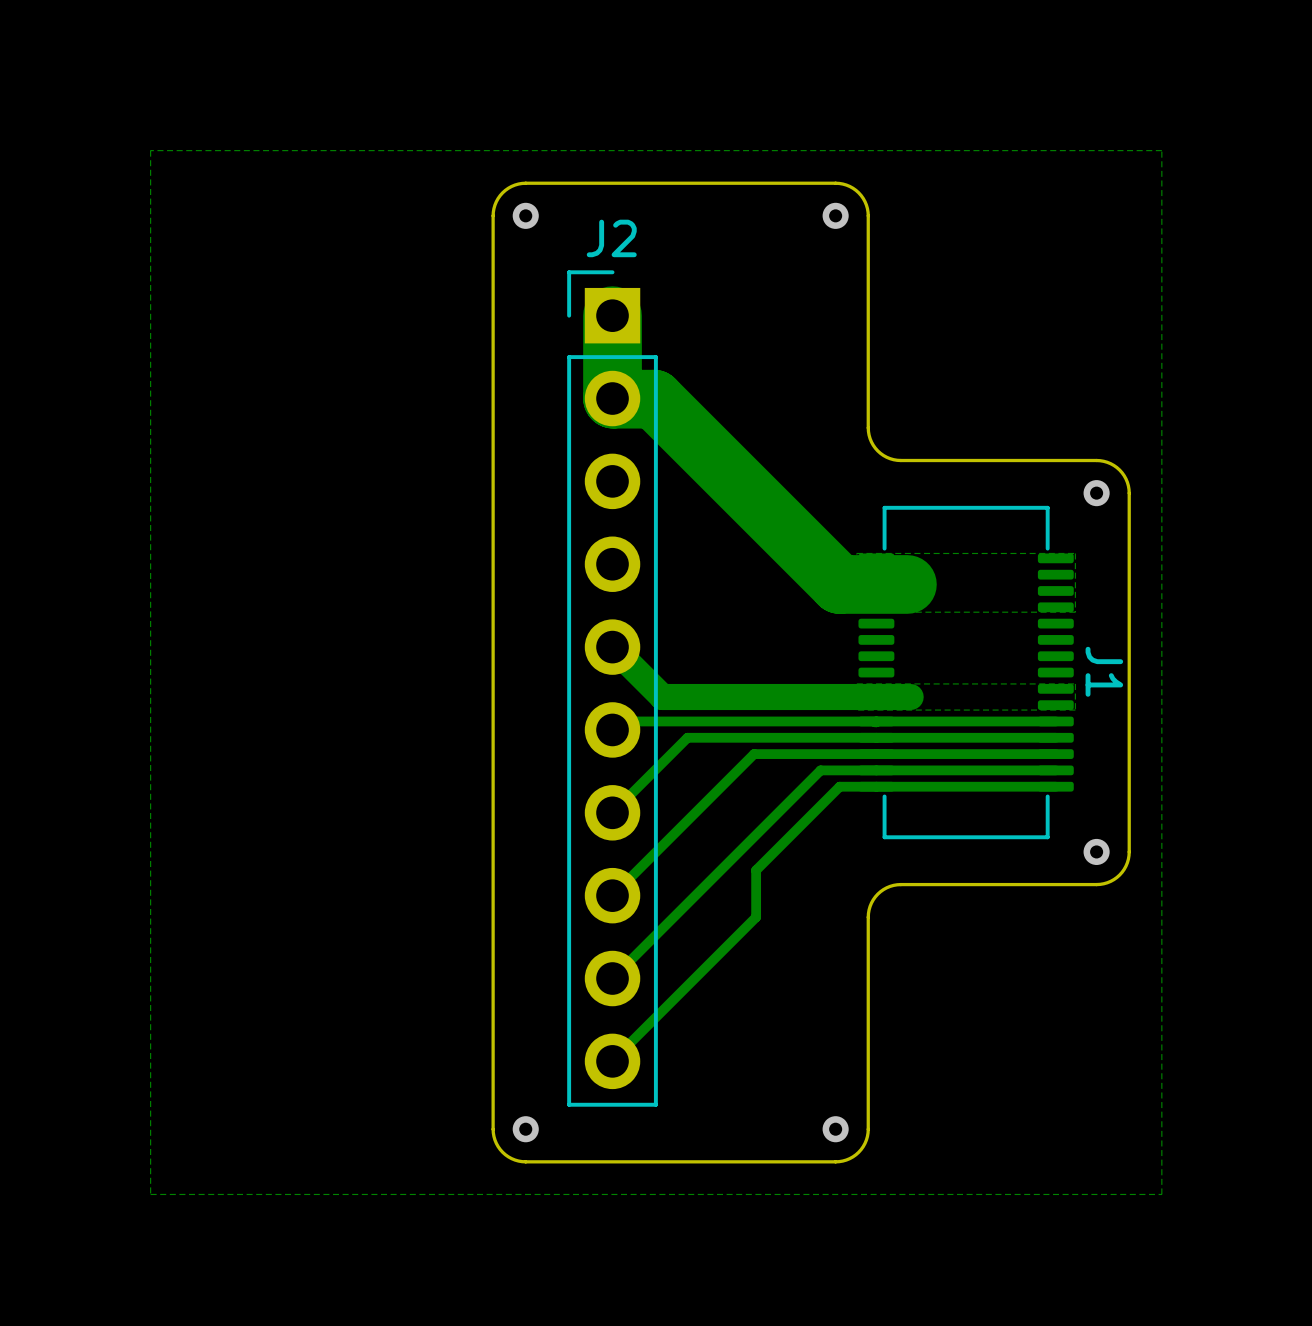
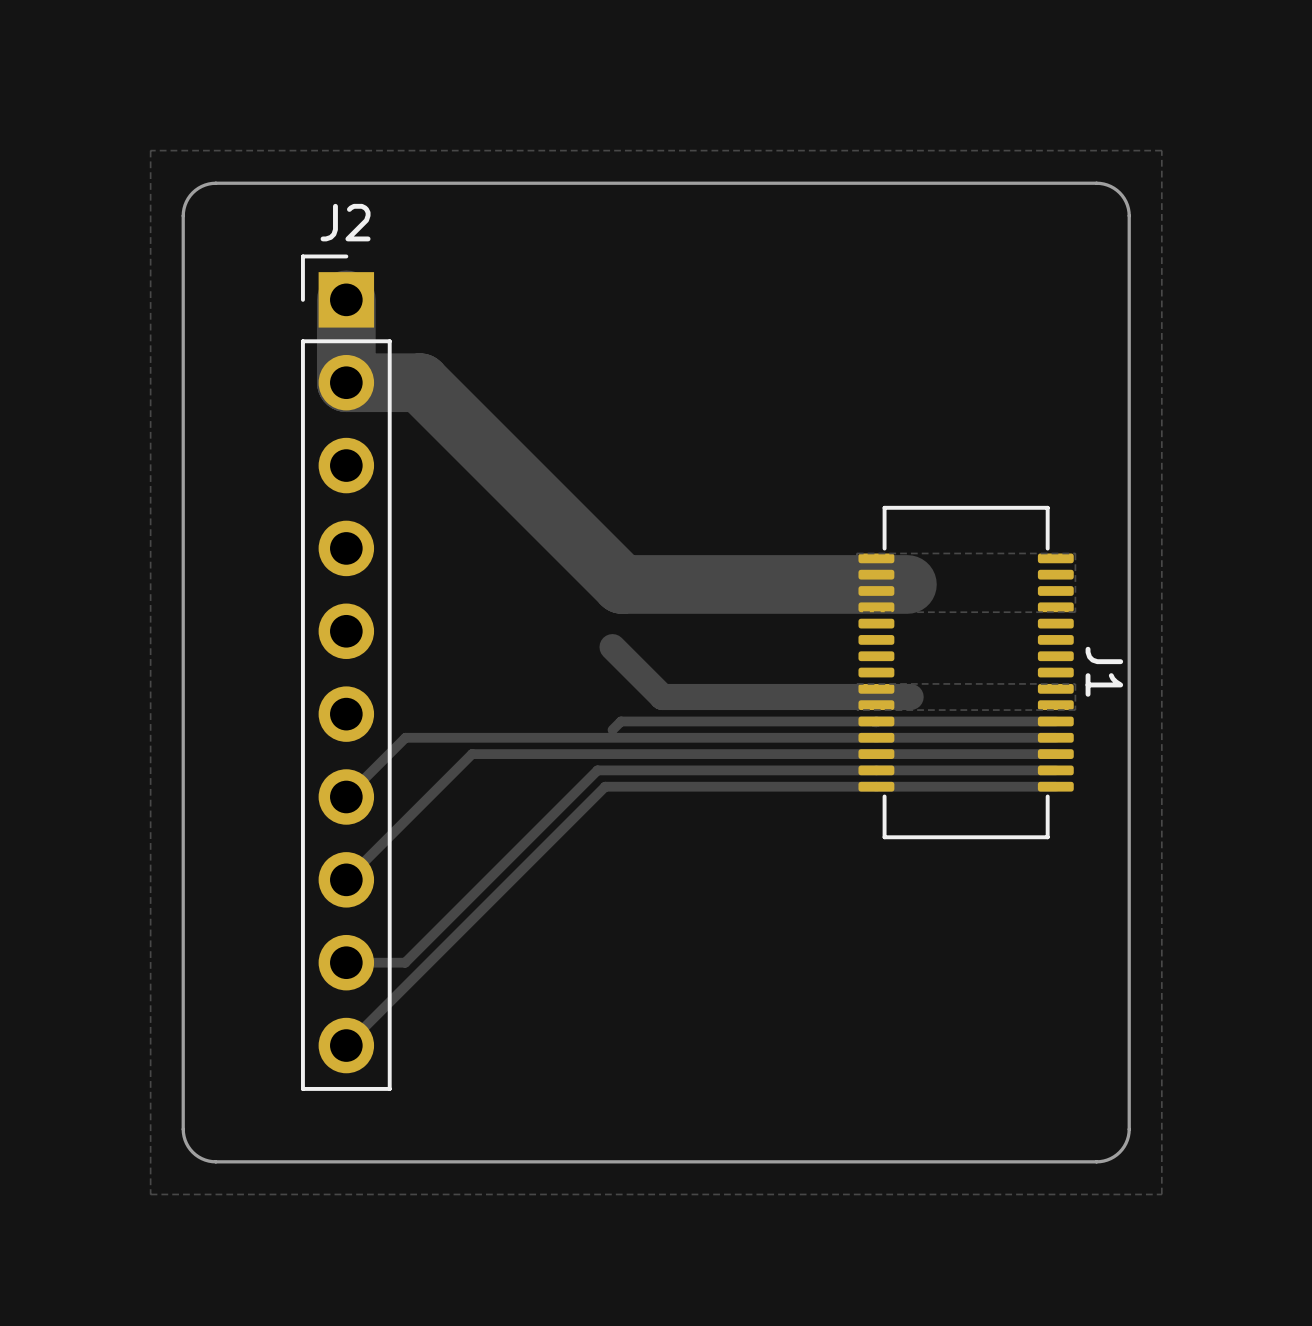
board edge: (525, 183) (511, 186) (502, 192) (496, 201) (493, 215) (493, 1129) (494, 1140) (502, 1152) (514, 1160) (525, 1161) -> (525, 183) (212, 183) (201, 186) (192, 192) (186, 201) (183, 215) (183, 1129) (185, 1140) (195, 1154) (212, 1161) (525, 1161)
board edge: (835, 183) (846, 185) (855, 190) (865, 201) (868, 212) (868, 427) (870, 438) (877, 450) (886, 457) (900, 460) (1100, 460) (1110, 463) (1119, 470) (1125, 478) (1129, 493) -> (835, 183) (1096, 183) (1107, 185) (1119, 192) (1125, 201) (1129, 215) (1129, 493)
via: (525, 215) -> none
via: (835, 215) -> none
track: (612, 315) (612, 398) (654, 399) (839, 584) -> (346, 299) (346, 382) (420, 382) (621, 584) (839, 584)
via: (1096, 493) -> none
J2 position: (612, 688) -> (346, 672)
track: (687, 737) (612, 812) -> (687, 737) (405, 737) (346, 796)
track: (754, 754) (612, 895) -> (754, 754) (472, 754) (346, 879)
track: (820, 770) (612, 978) -> (820, 770) (597, 770) (405, 962) (346, 962)
track: (839, 786) (756, 870) (756, 917) (612, 1060) -> (839, 786) (605, 786) (346, 1045)
via: (1096, 851) -> none
board edge: (1129, 851) (1125, 866) (1119, 875) (1110, 881) (1100, 884) (900, 884) (886, 887) (877, 894) (871, 903) (868, 917) (868, 1132) (865, 1143) (858, 1152) (846, 1160) (835, 1161) -> (1129, 851) (1129, 1129) (1125, 1143) (1119, 1152) (1107, 1160) (1096, 1161) (835, 1161)
via: (525, 1129) -> none
via: (835, 1129) -> none

